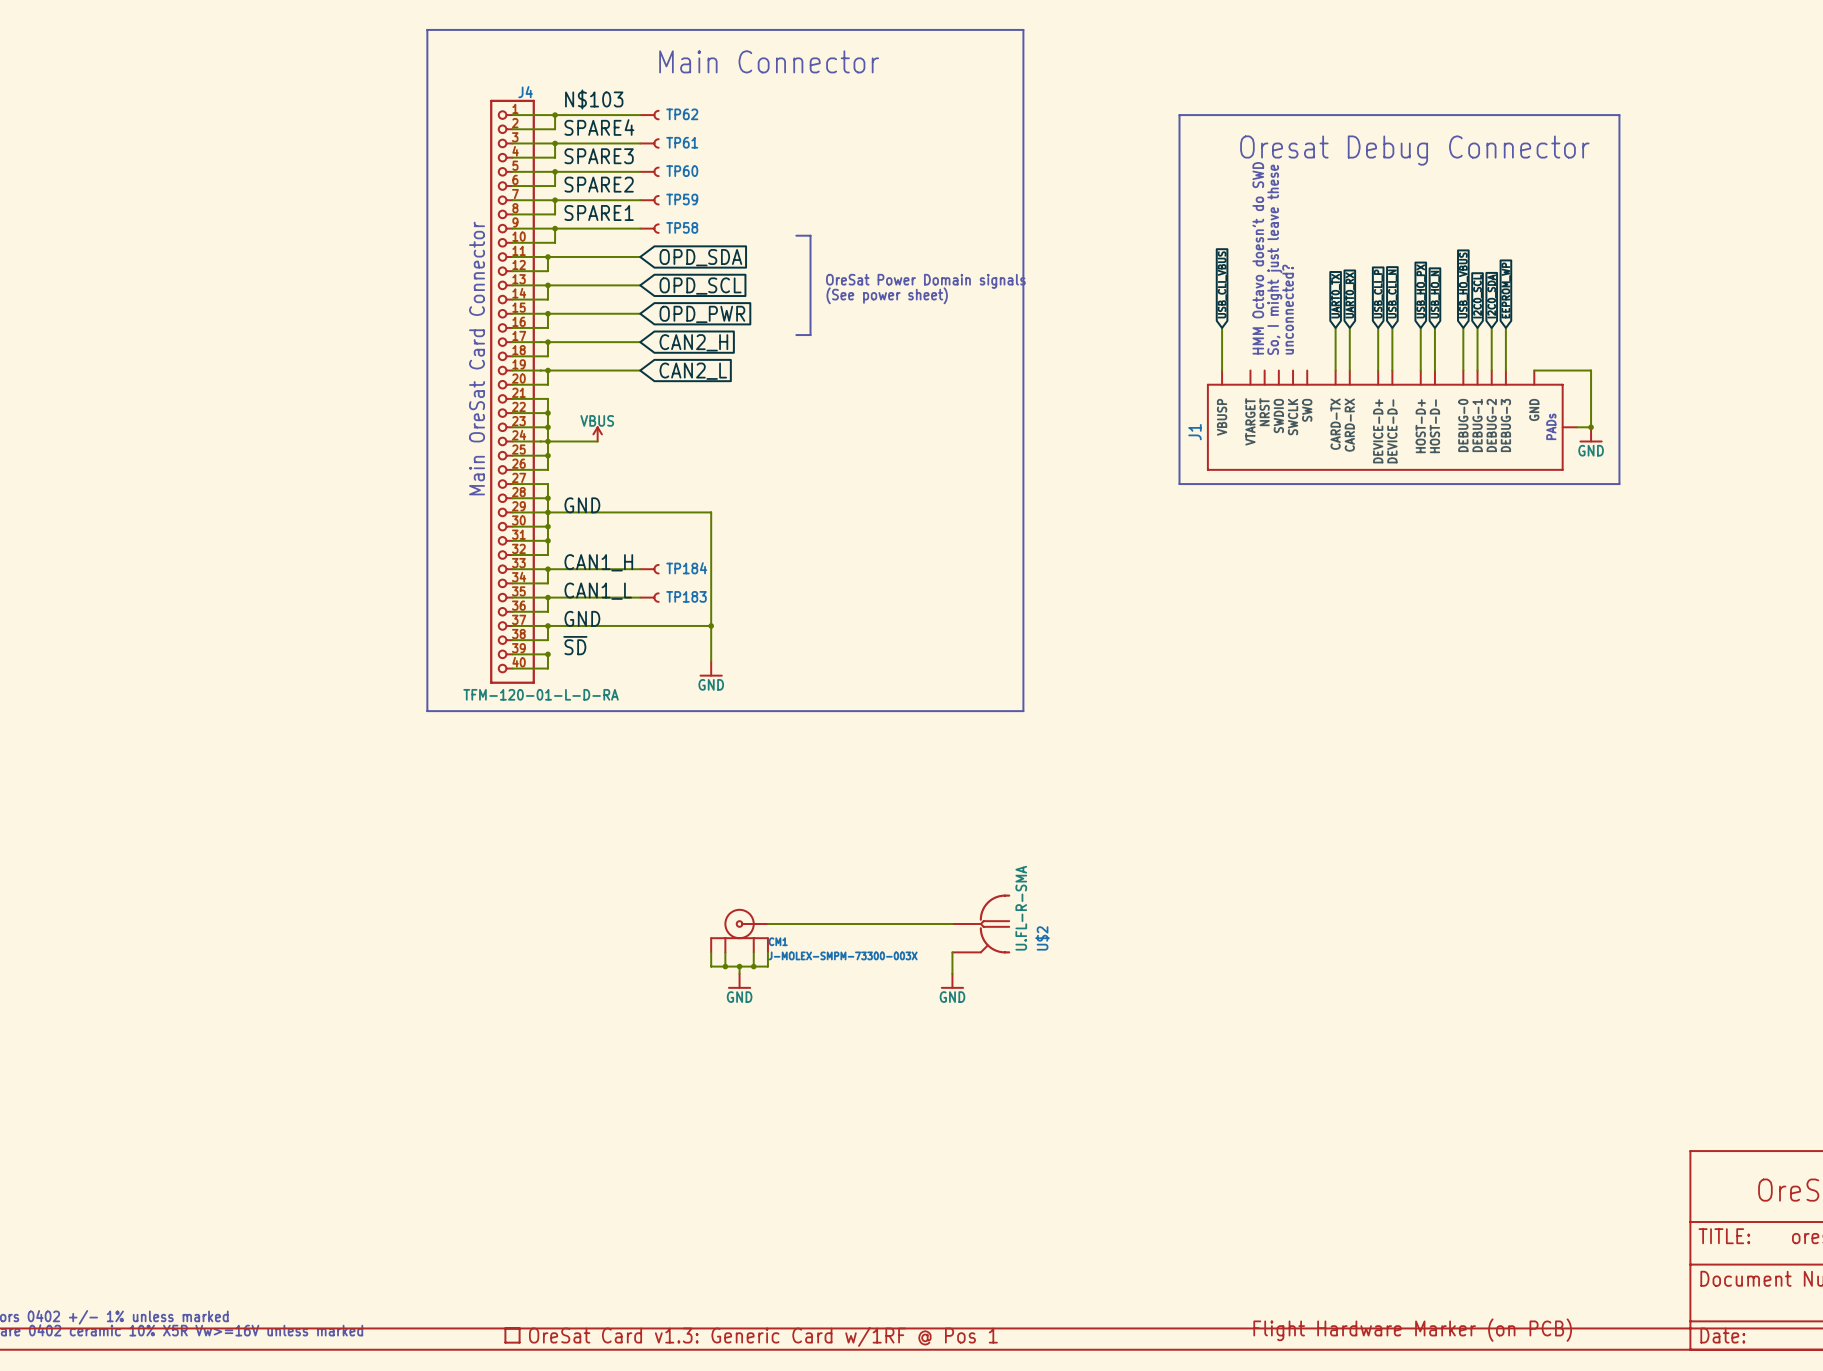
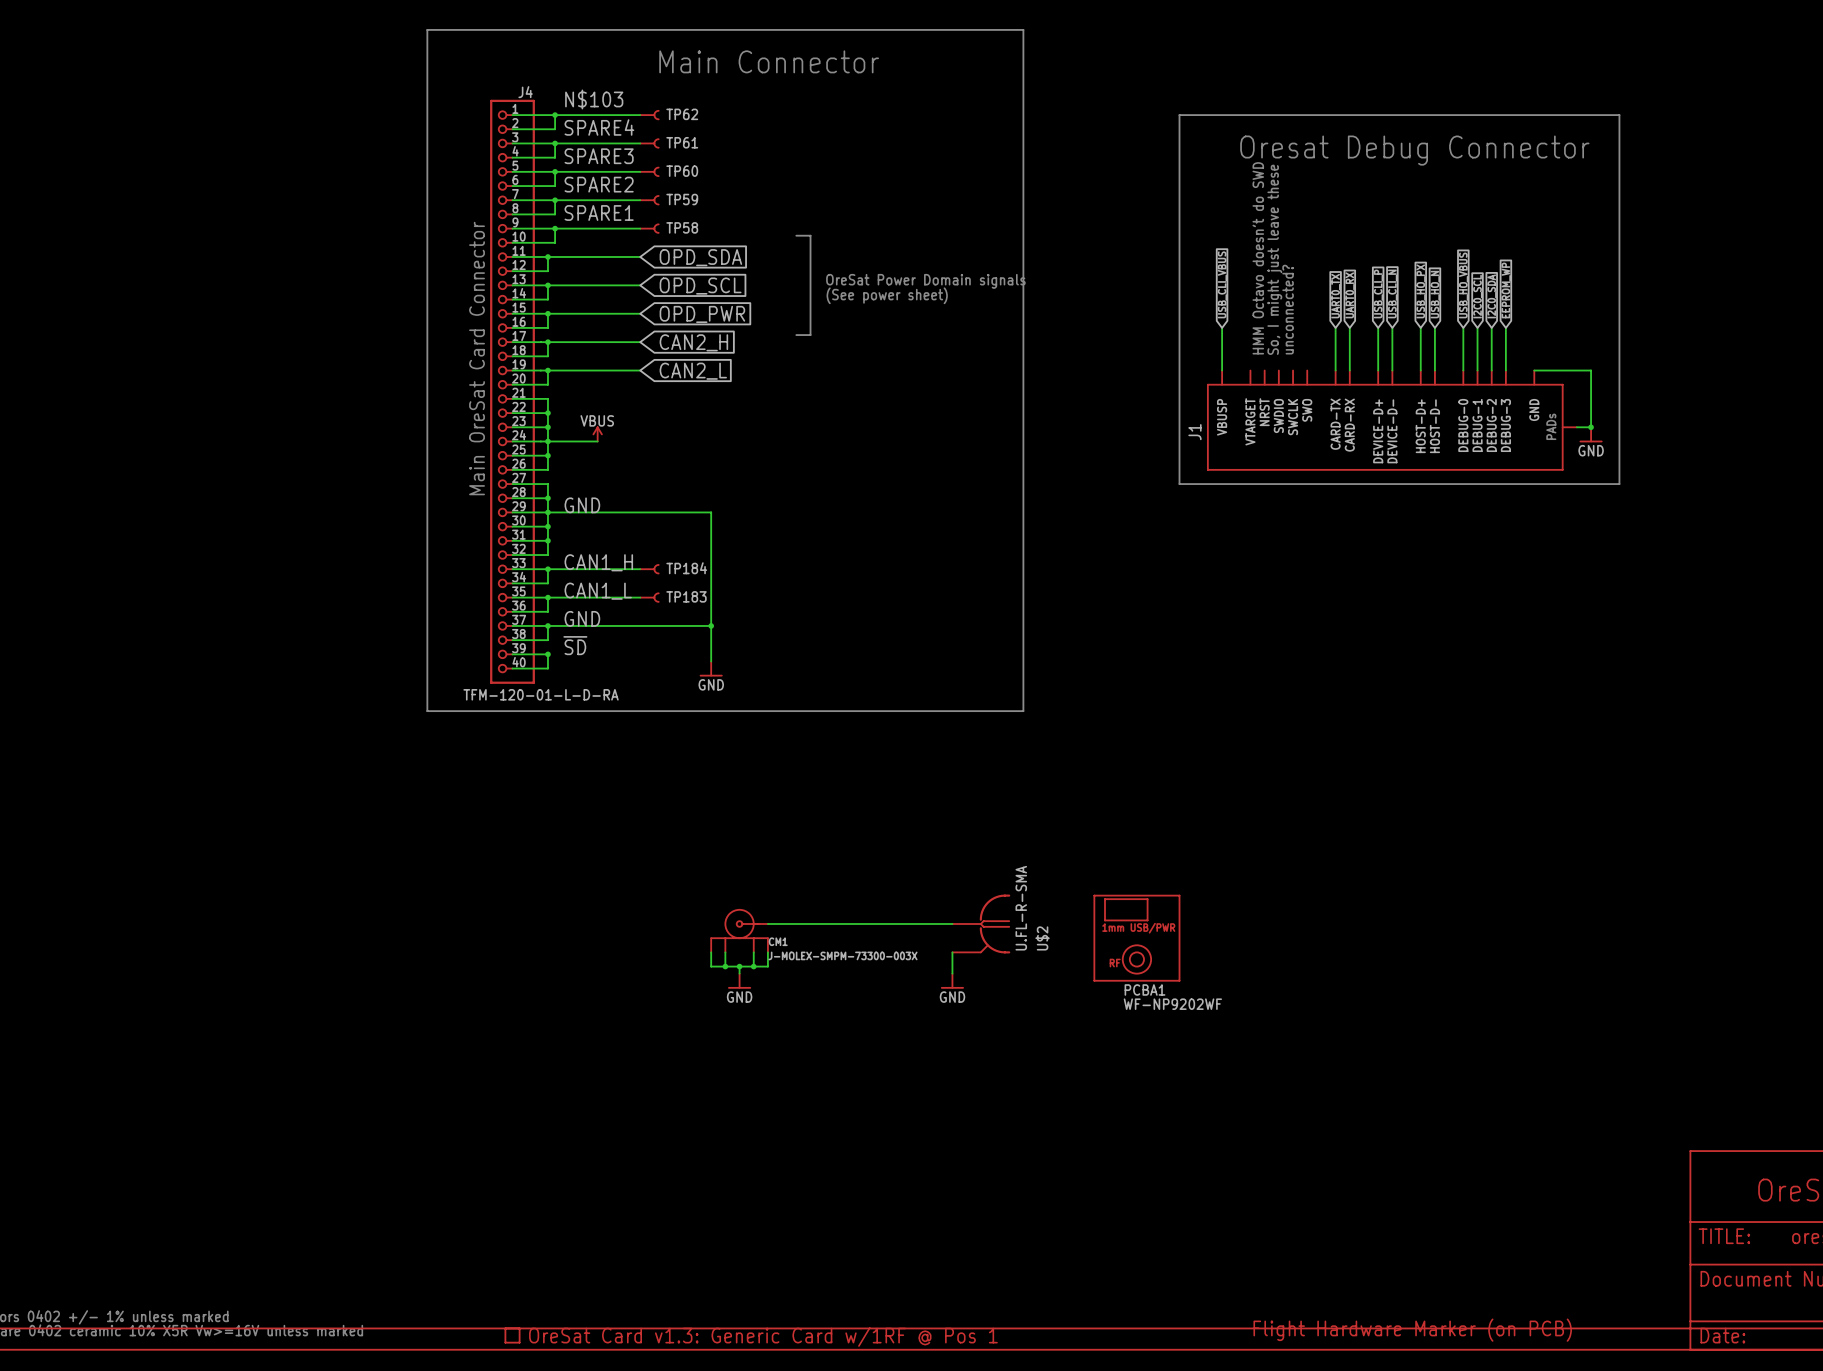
PCBA1: none -> WF-NP9202WF (1136, 938)

